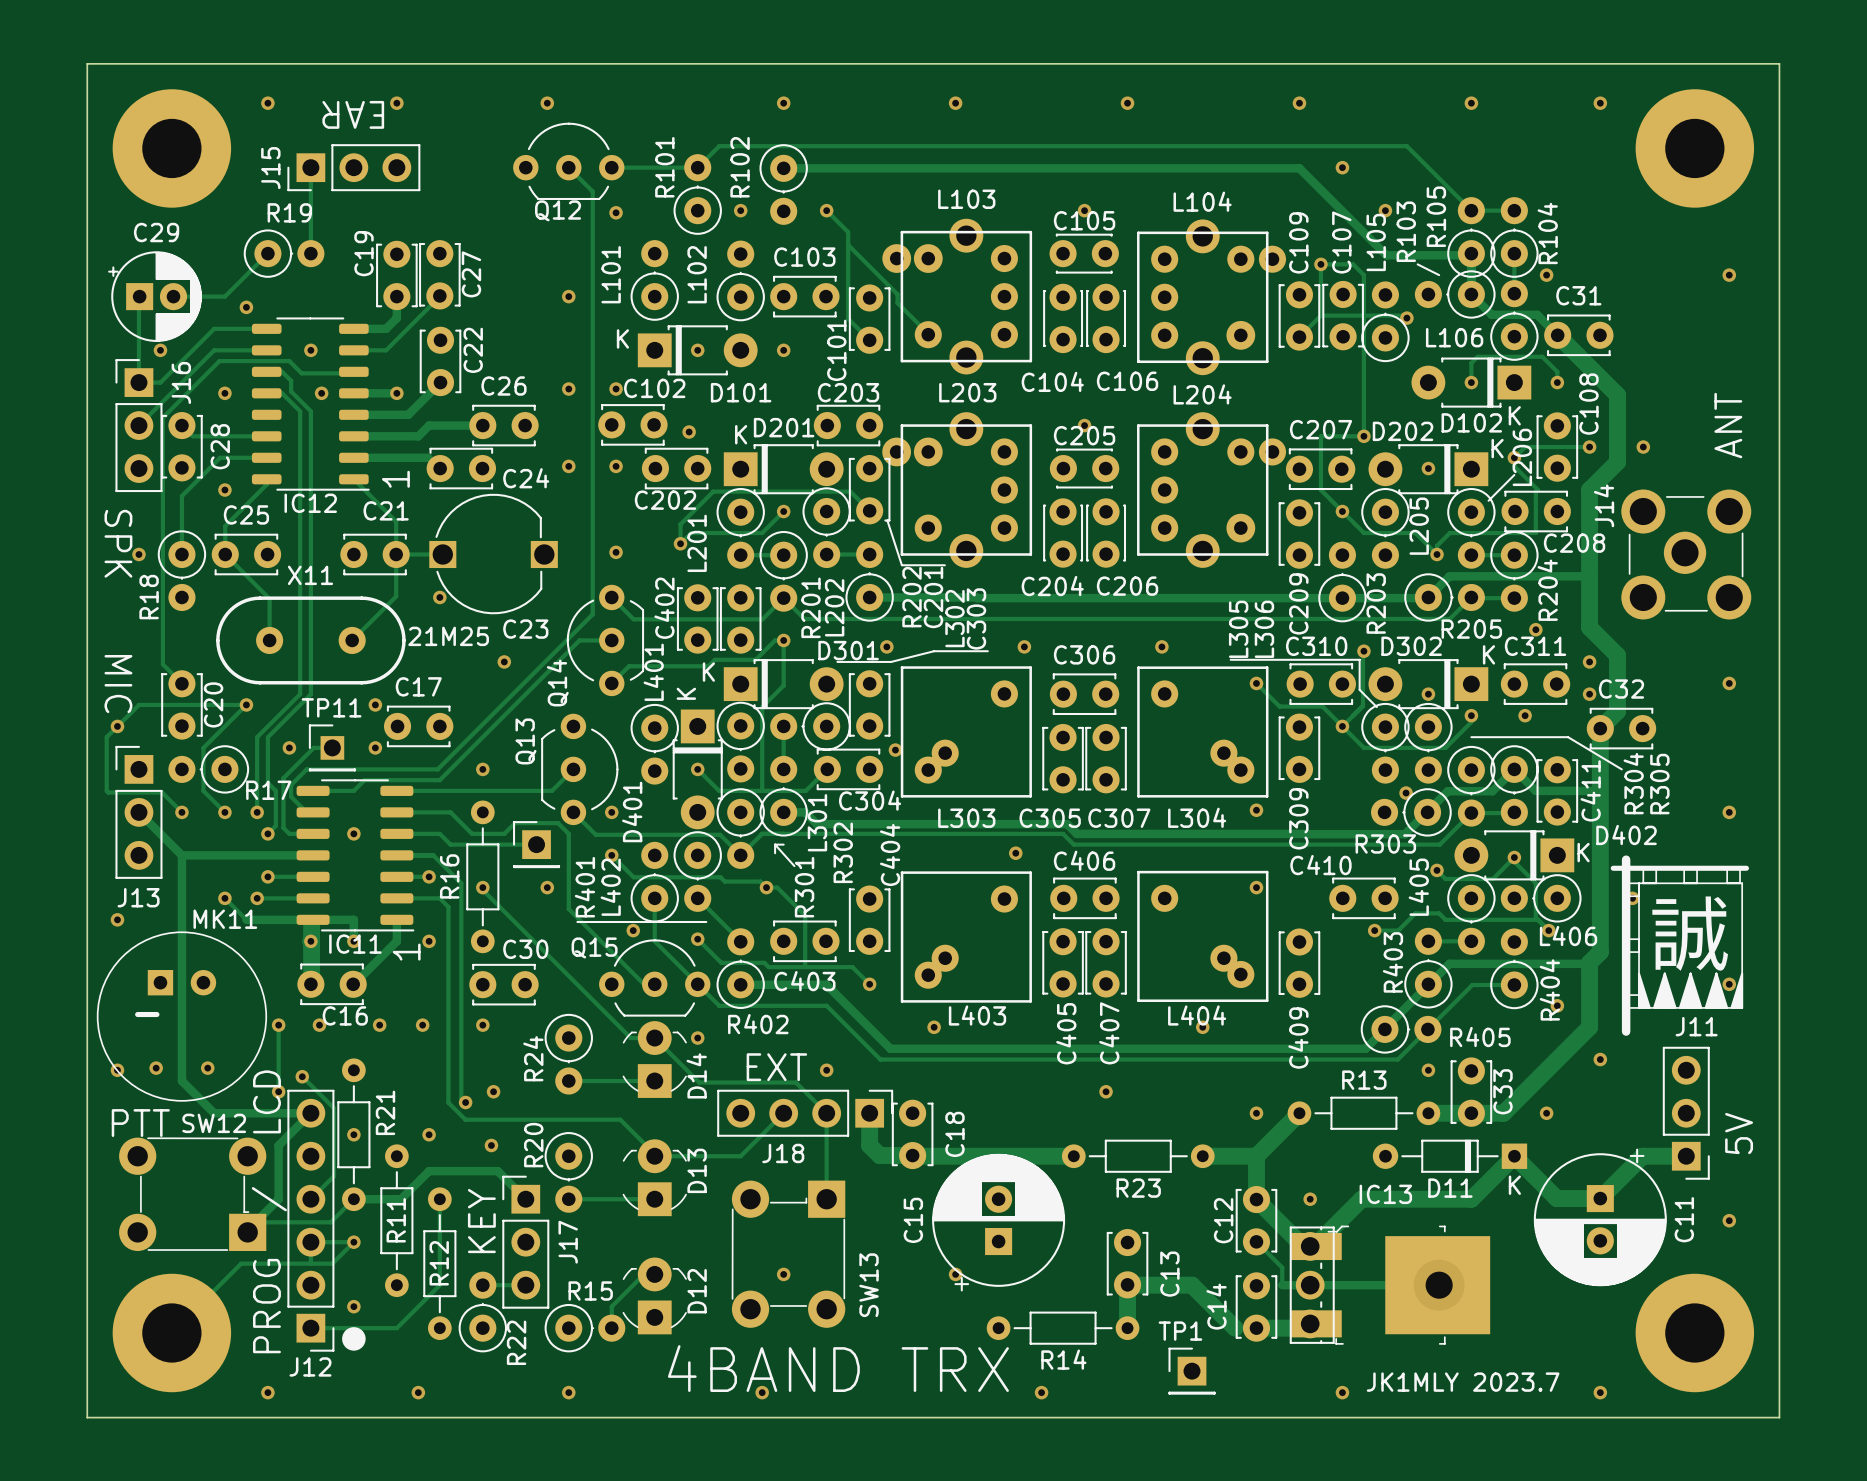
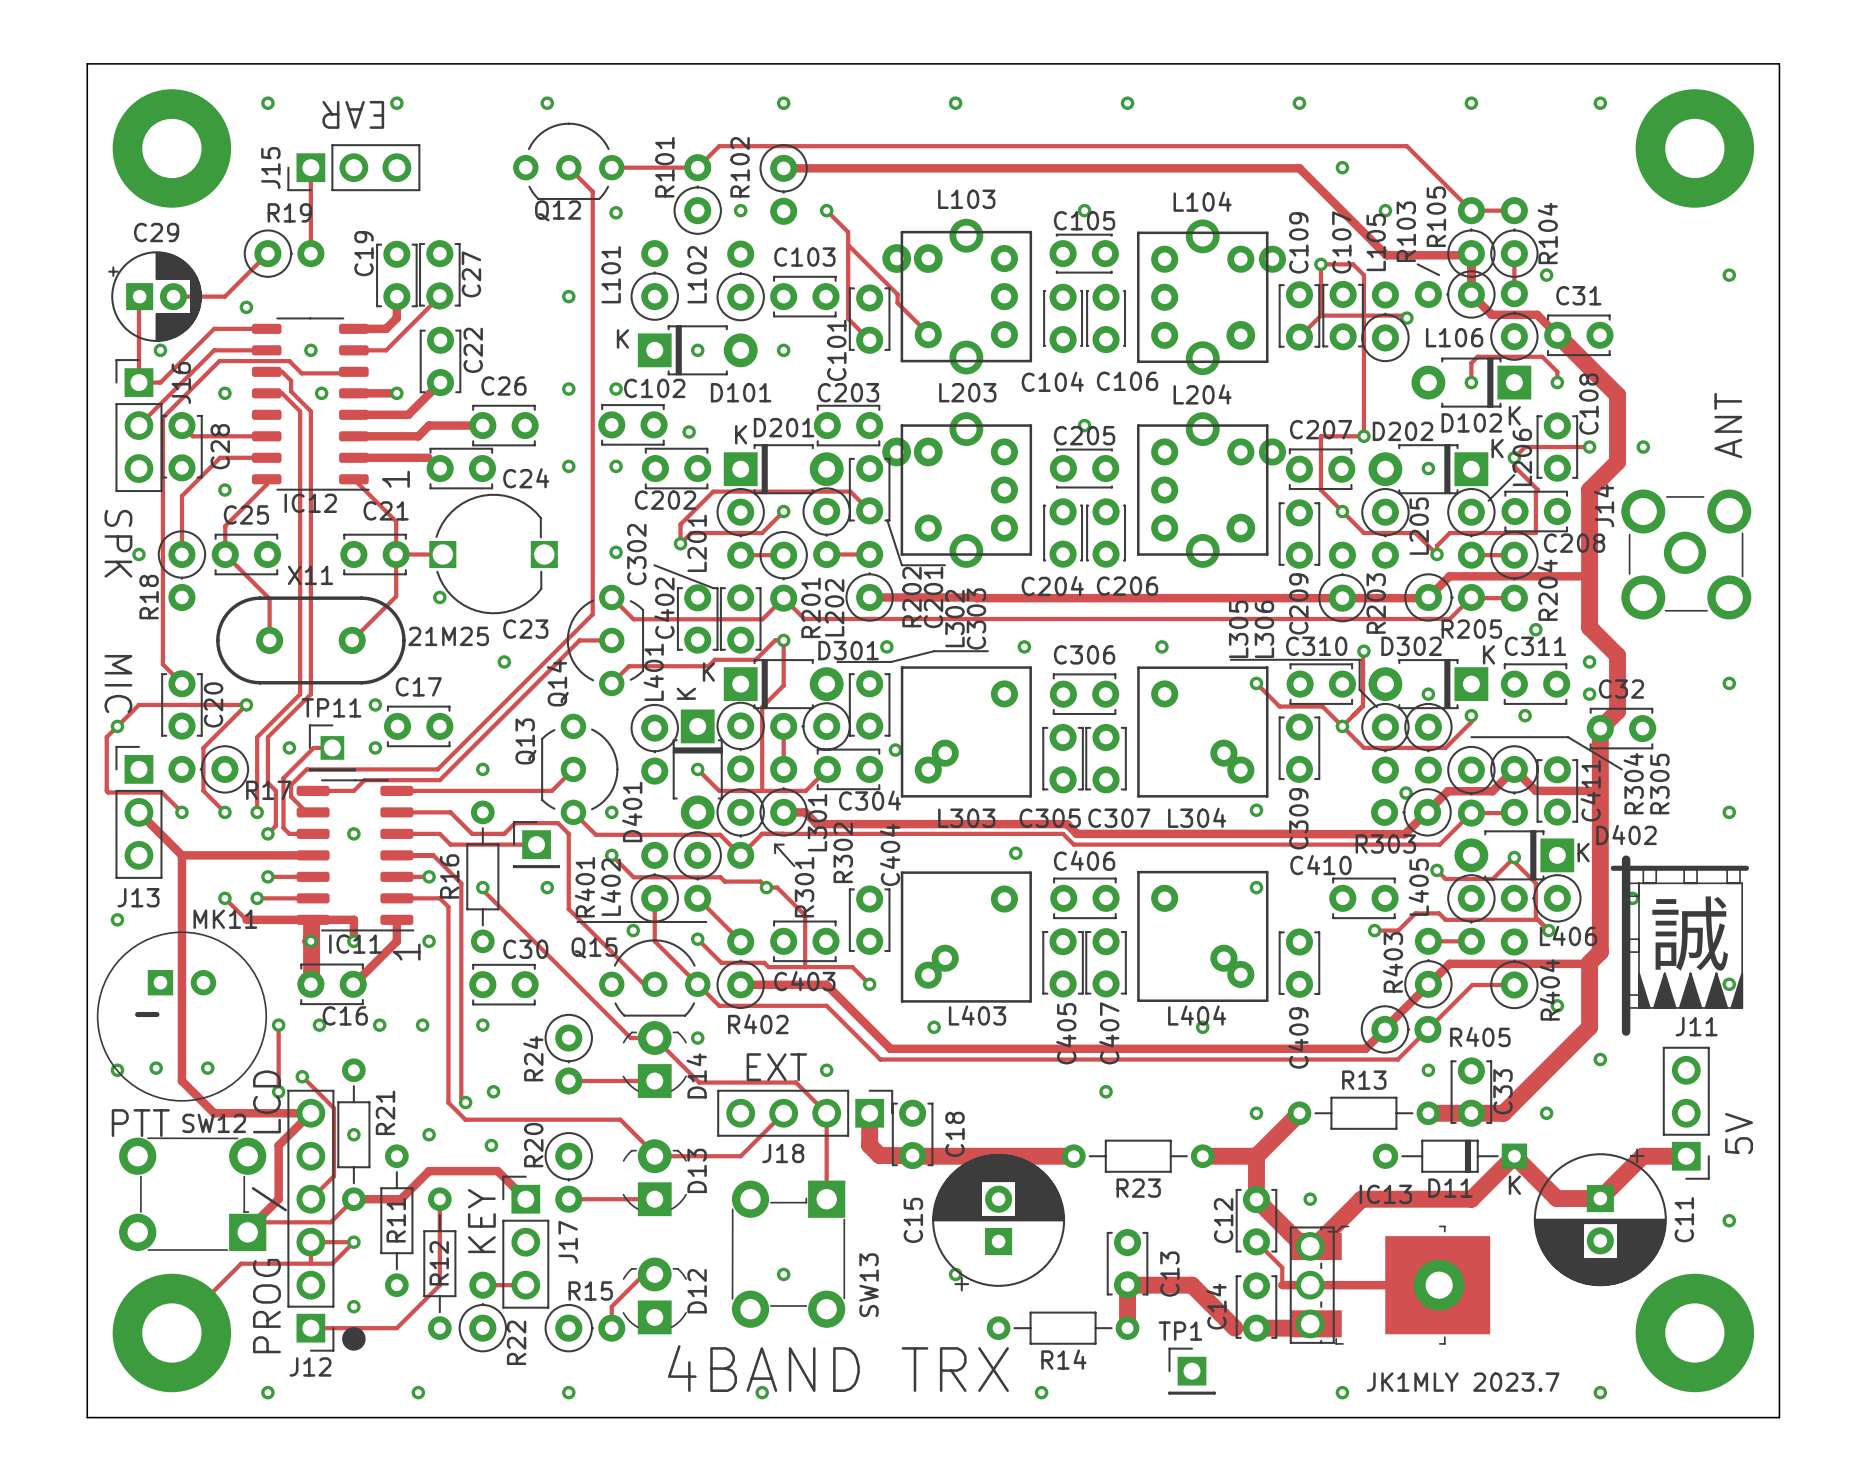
C302 name: none -> C302 (636, 554)
line: none -> (654, 565) (713, 588)

